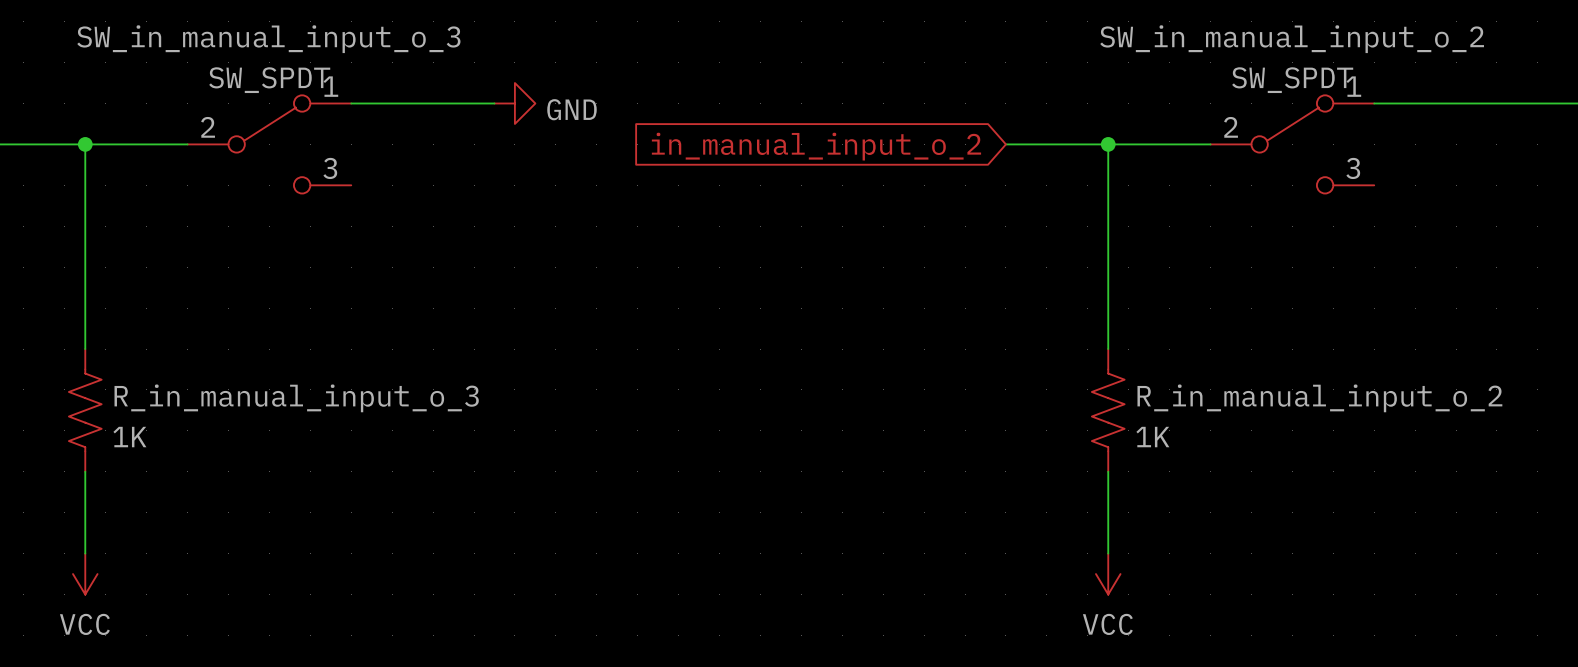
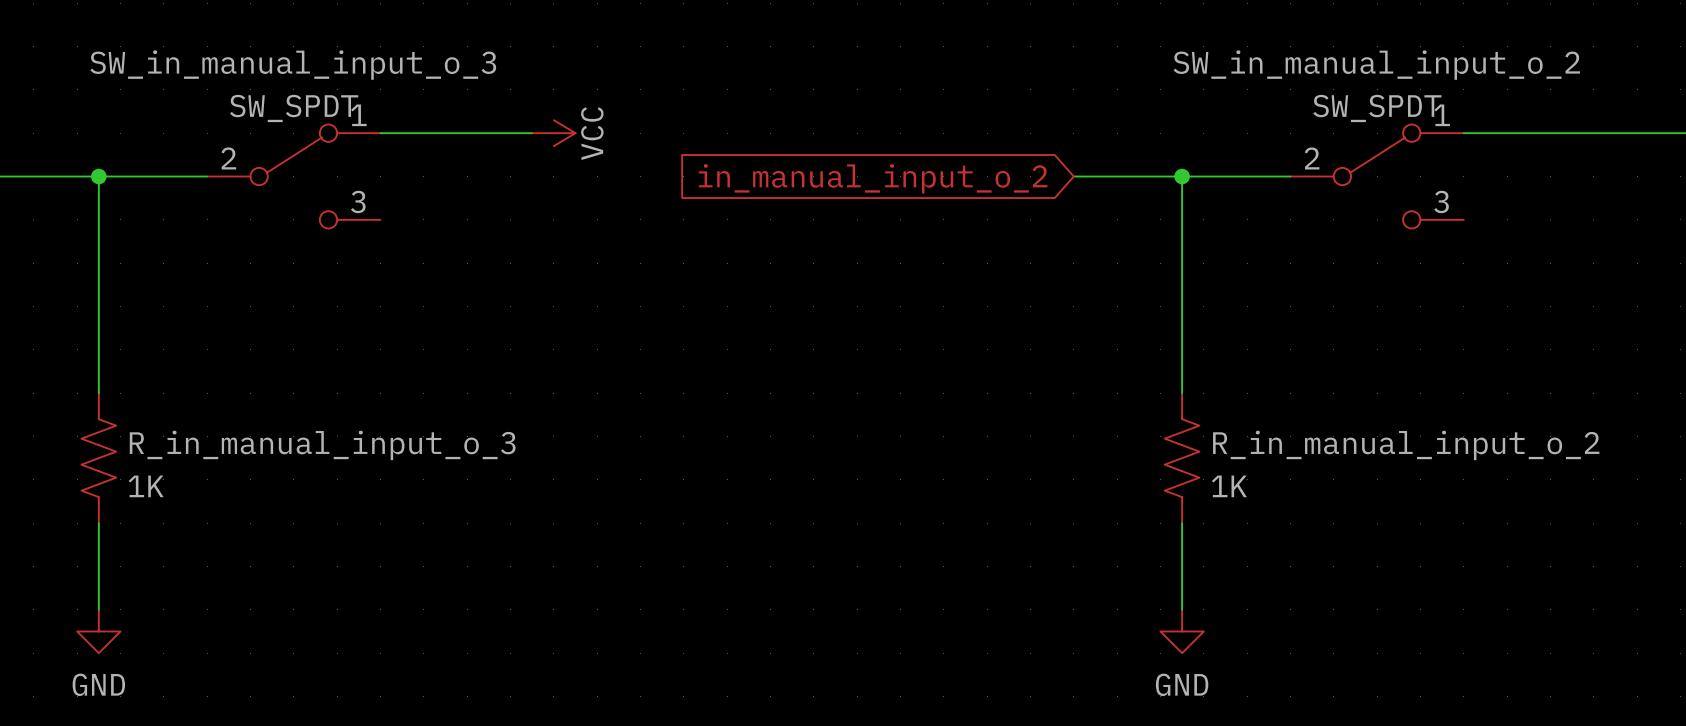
power symbol: GND (514, 103) -> VCC (553, 133)
power symbol: VCC (85, 574) -> GND (98, 631)
power symbol: VCC (1108, 574) -> GND (1182, 631)

